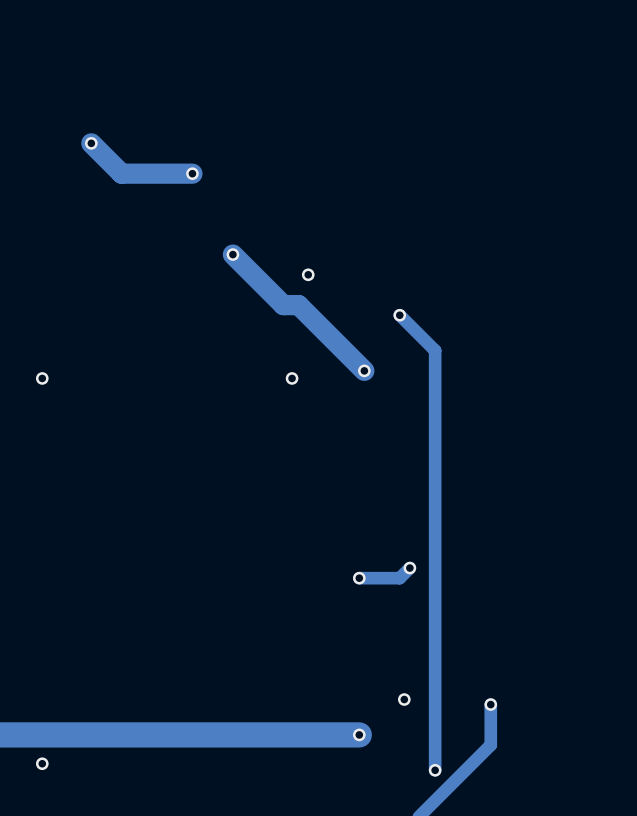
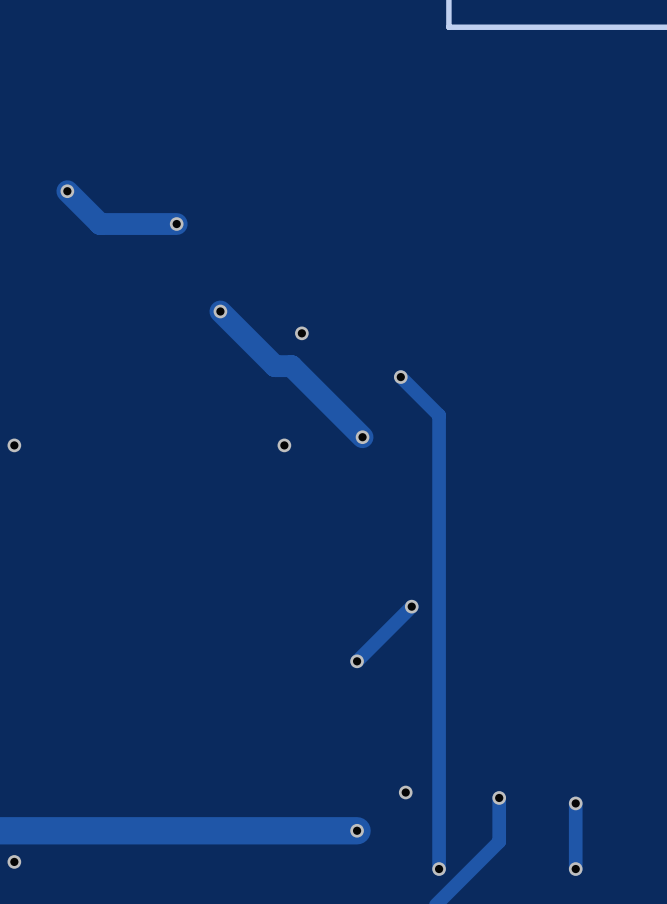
track: (409, 568) (399, 578) (359, 578) -> (411, 606) (357, 661)
via position: (409, 568) -> (411, 606)
track: none -> (575, 803) (575, 869)
via: none -> (575, 803)
via: none -> (575, 869)

